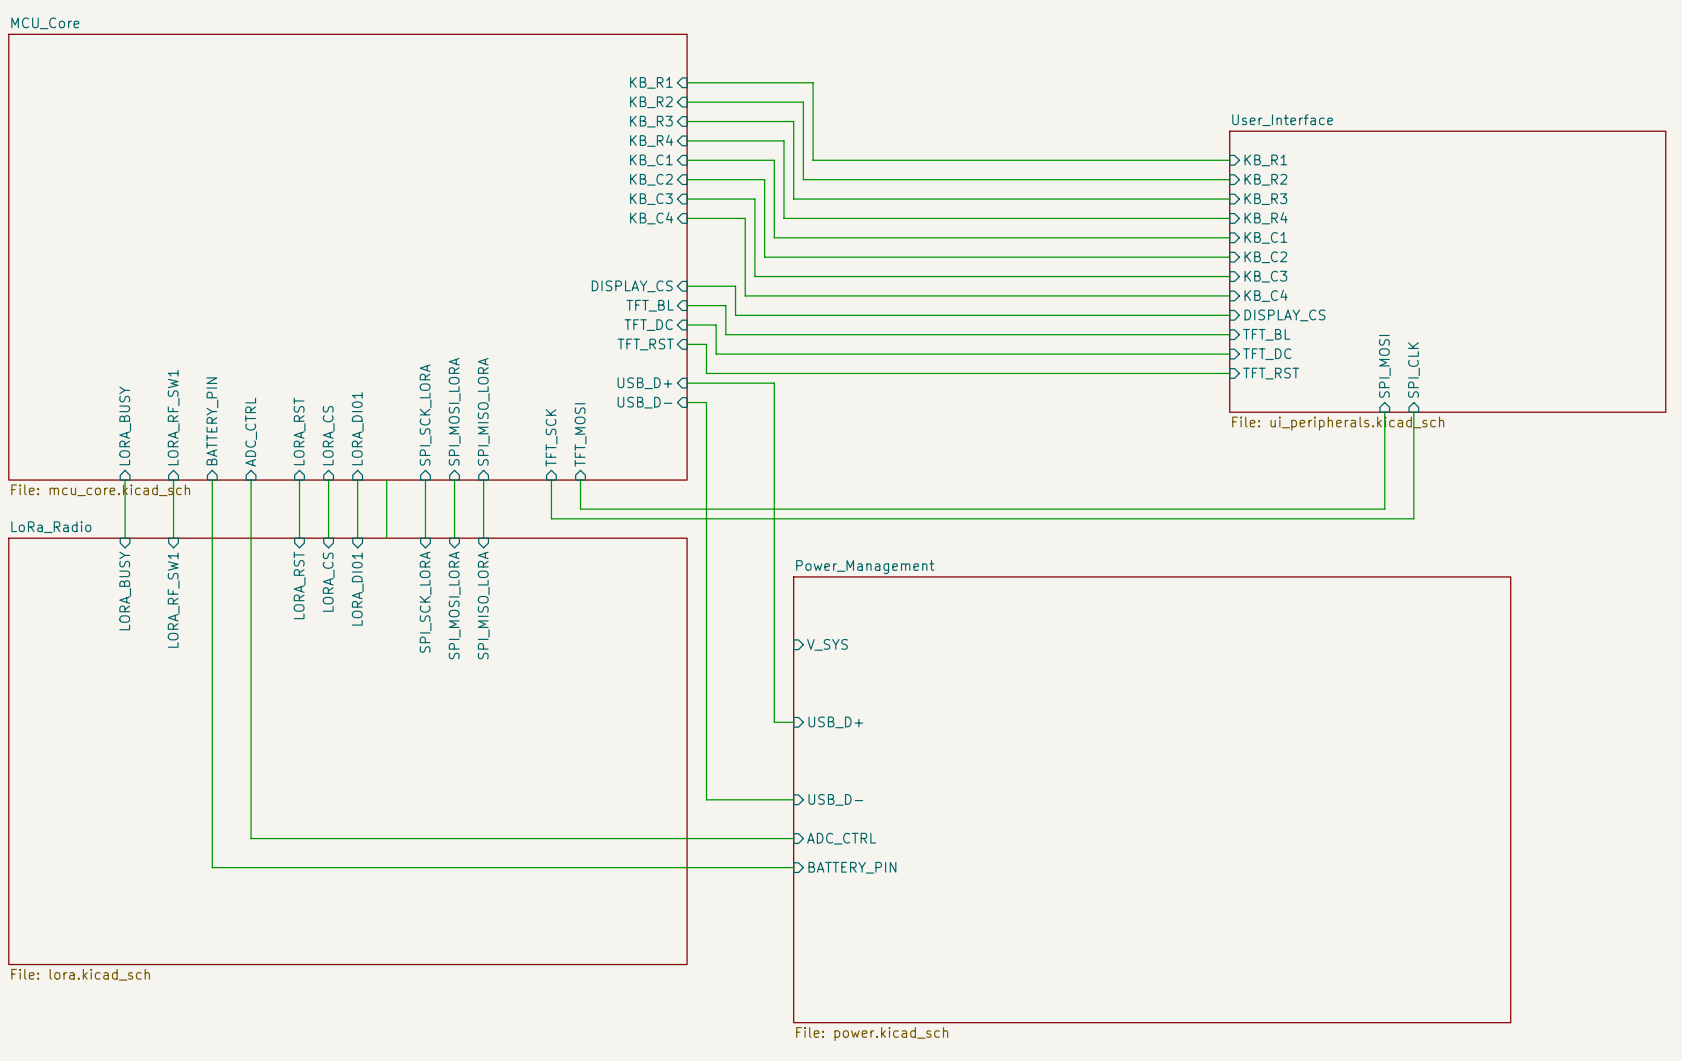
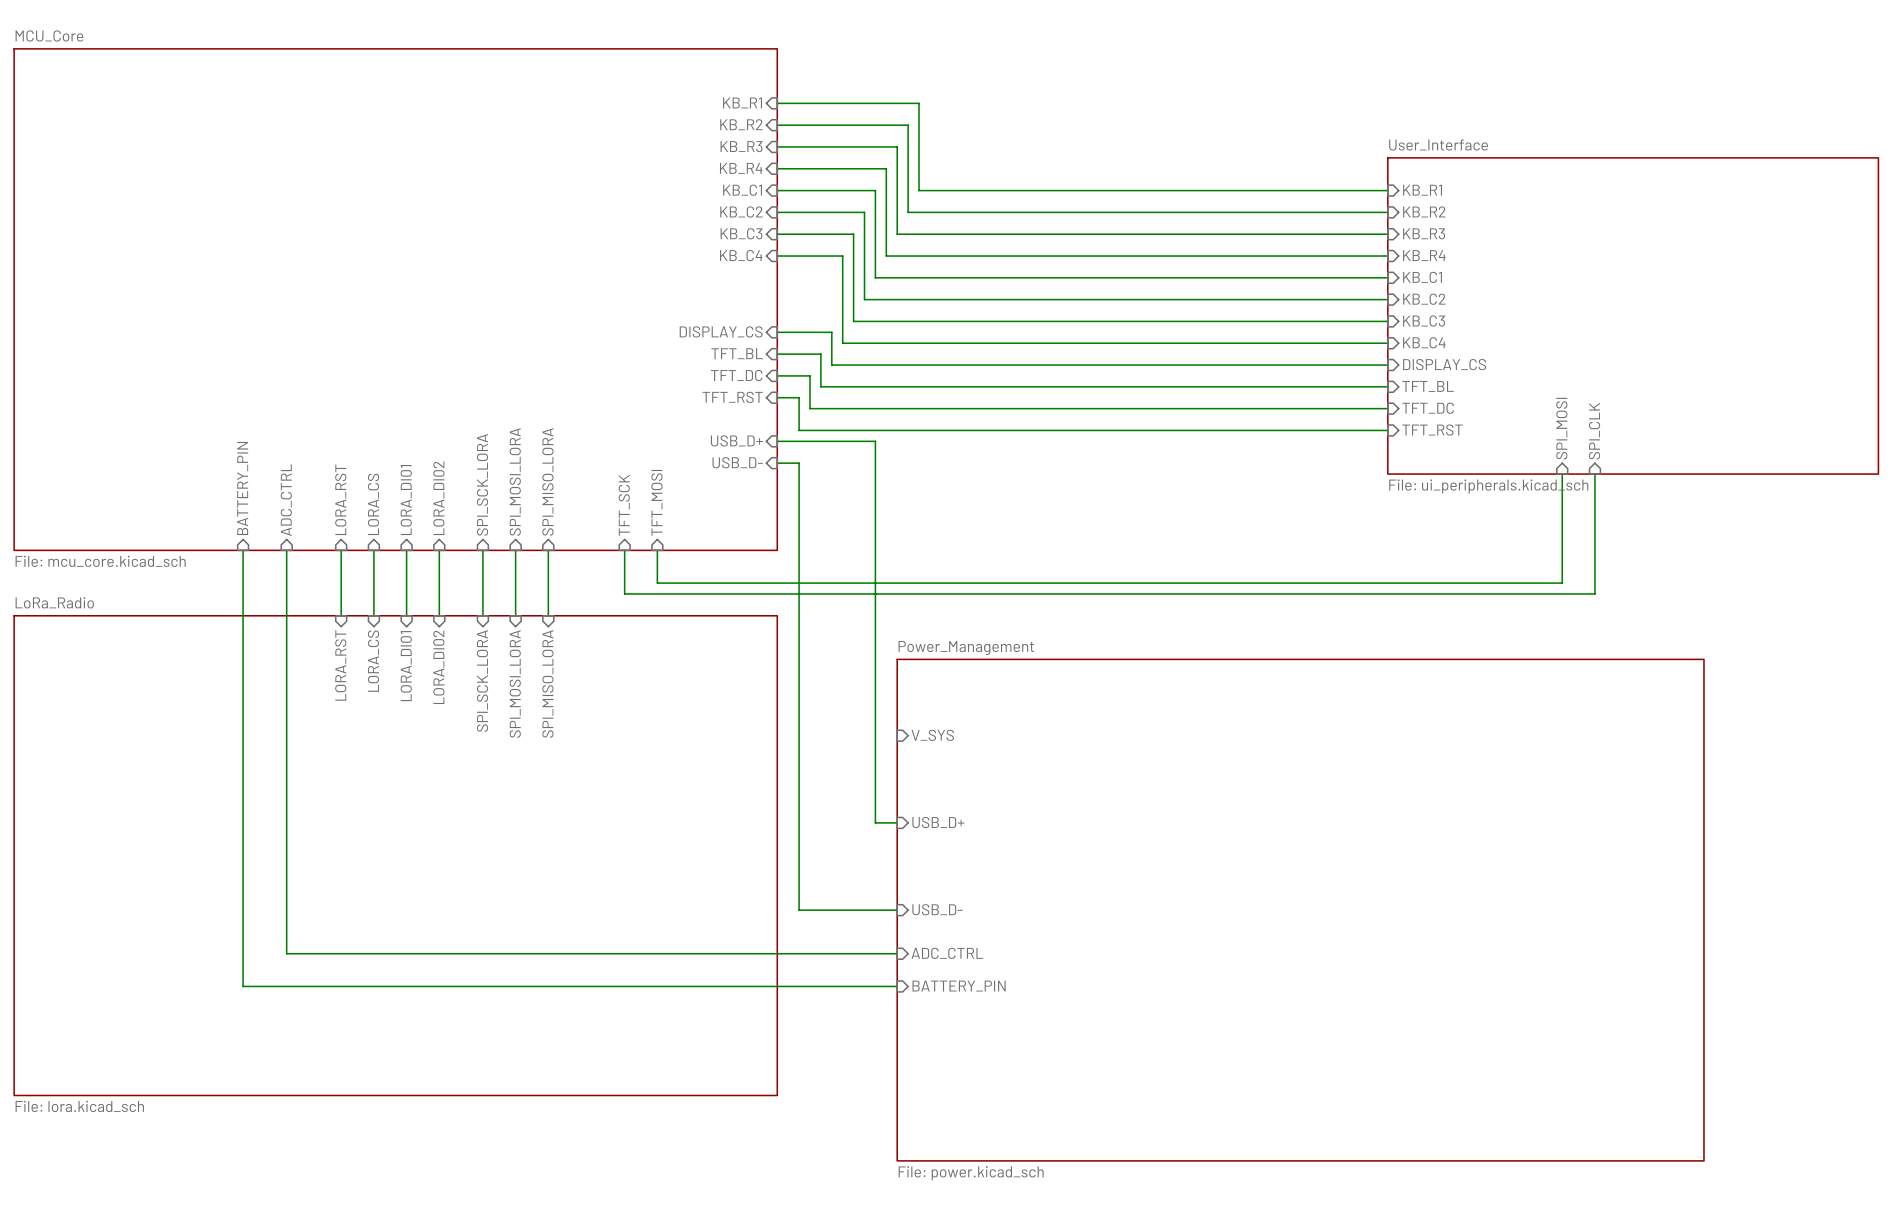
sheet pin: LORA_RF_SW1 (173, 417) -> none
sheet pin: LORA_BUSY (125, 425) -> none
sheet pin: none -> LORA_DI02 (438, 498)
wire: (125, 480) (125, 538) -> none
wire: (173, 480) (173, 538) -> none
sheet pin: none -> LORA_DI02 (438, 667)
sheet pin: LORA_BUSY (125, 590) -> none
sheet pin: LORA_RF_SW1 (173, 600) -> none

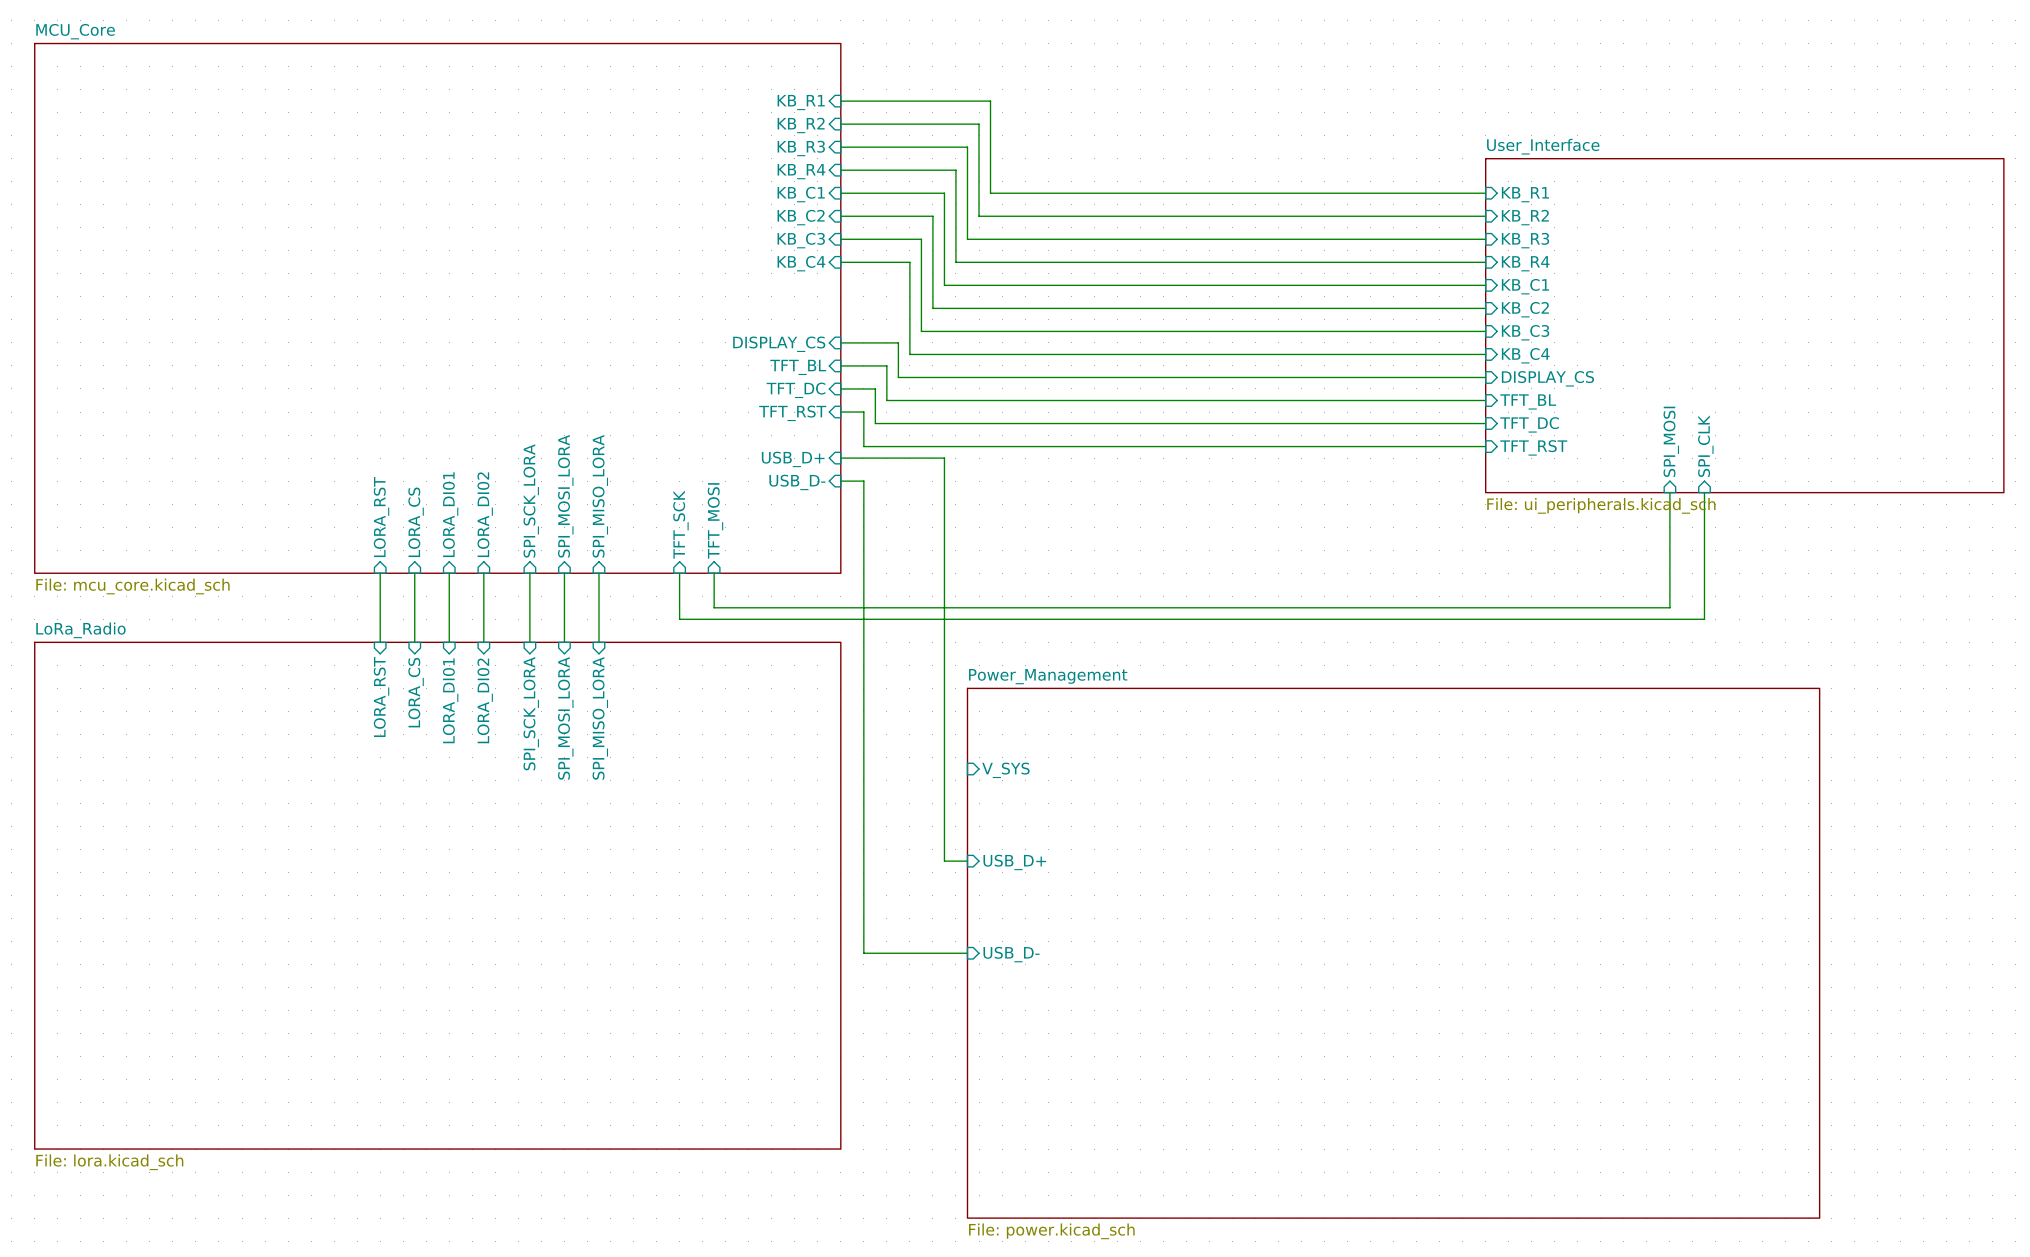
sheet pin: BATTERY_PIN (242, 488) -> none
sheet pin: ADC_CTRL (286, 500) -> none
wire: (243, 550) (243, 986) (897, 986) -> none
wire: (286, 550) (286, 953) (897, 953) -> none
sheet pin: ADC_CTRL (947, 953) -> none
sheet pin: BATTERY_PIN (959, 986) -> none

